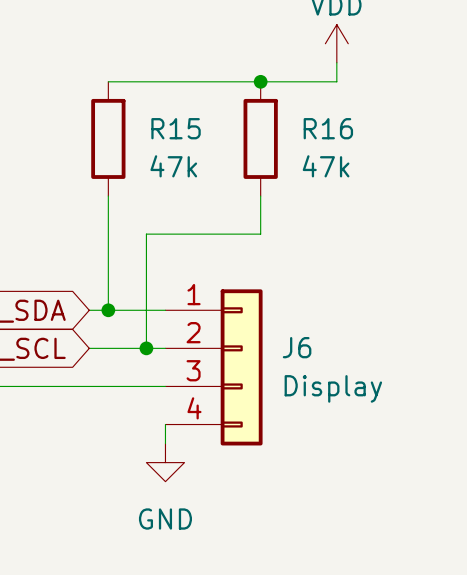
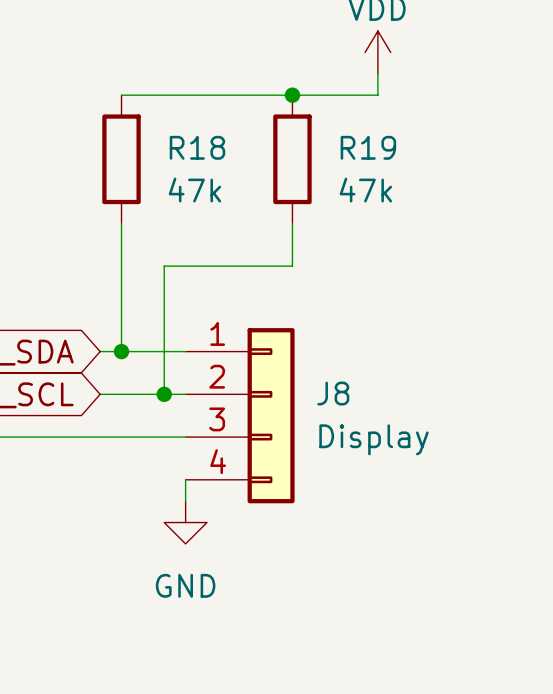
R15 name: R15 (176, 128) -> R18 (197, 147)
R16 name: R16 (328, 128) -> R19 (368, 147)
J6 name: J6 (297, 347) -> J8 (333, 393)

